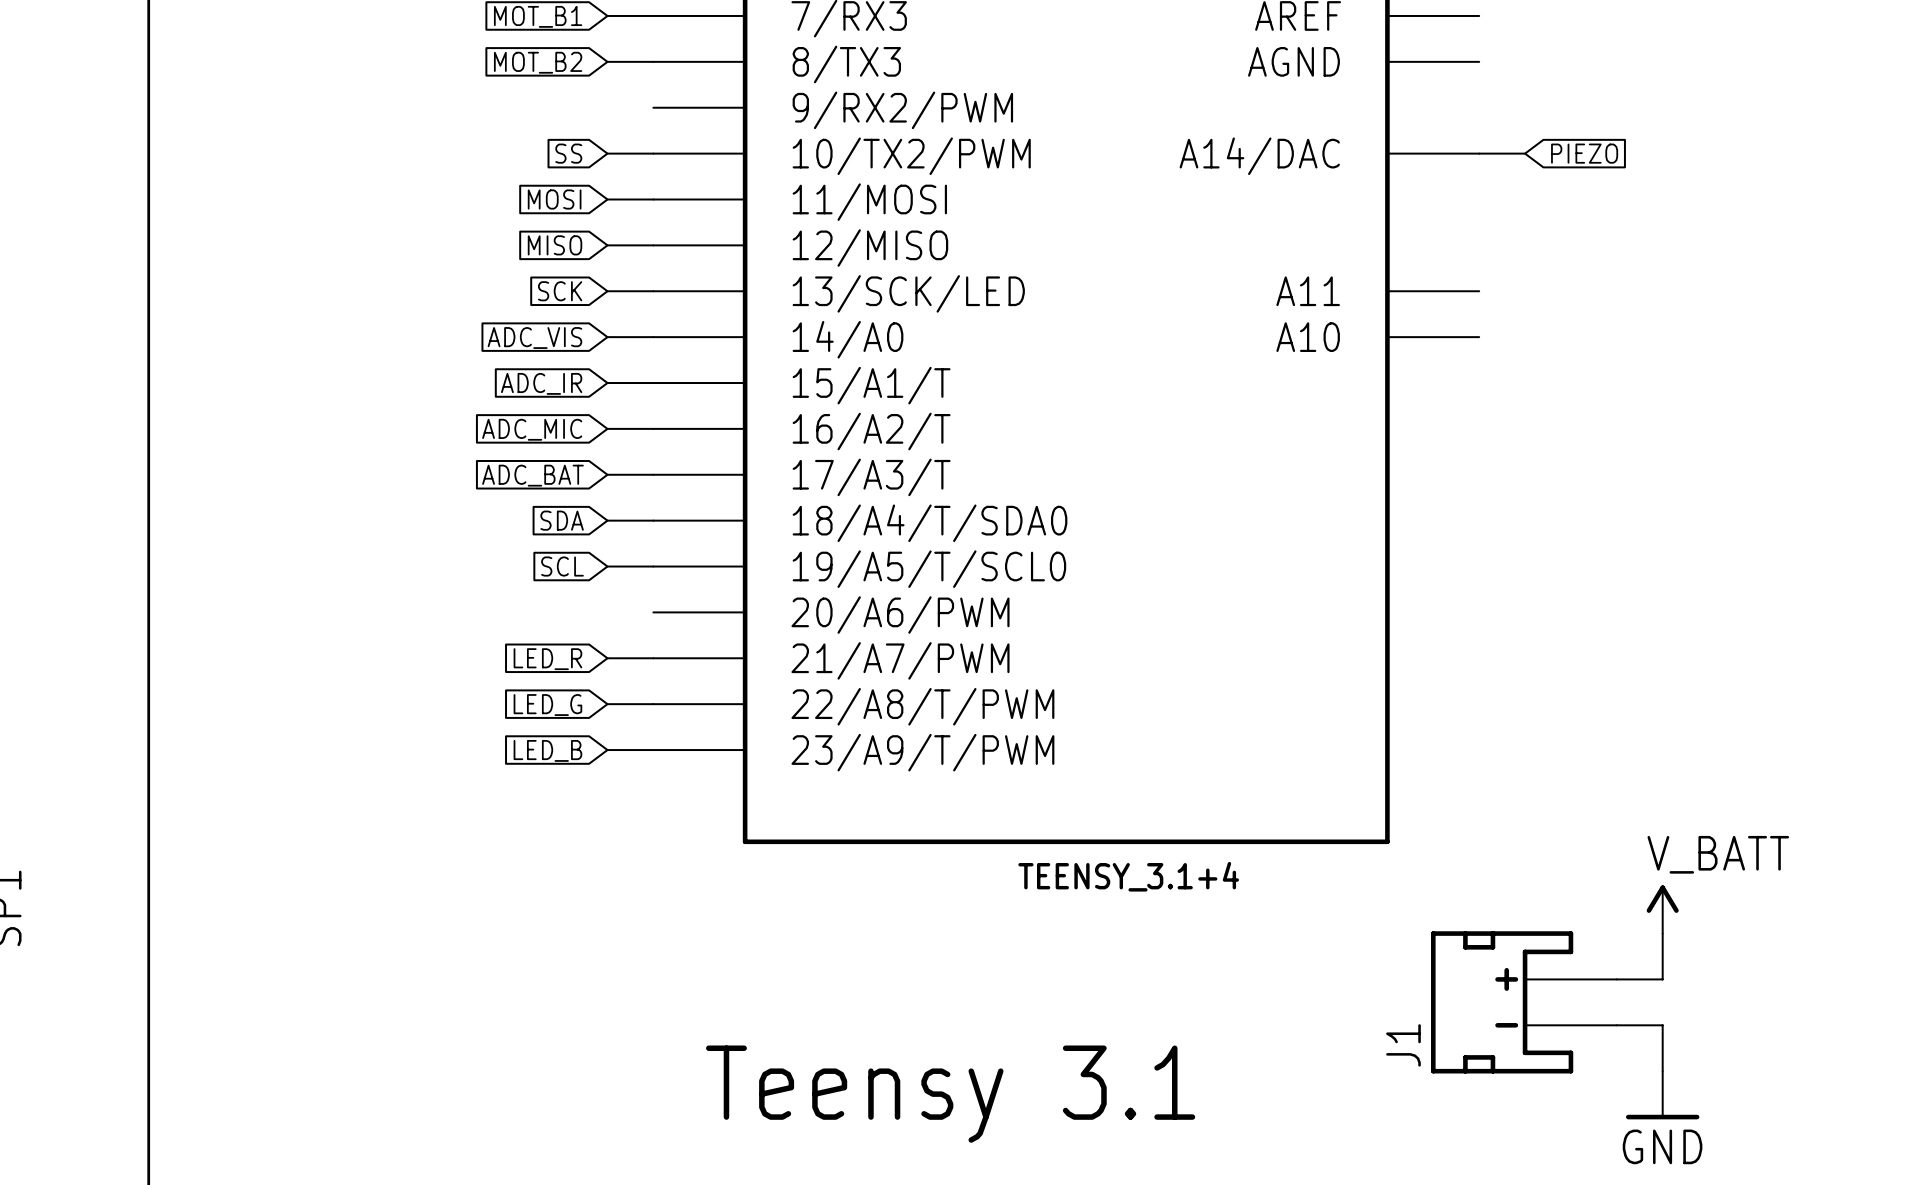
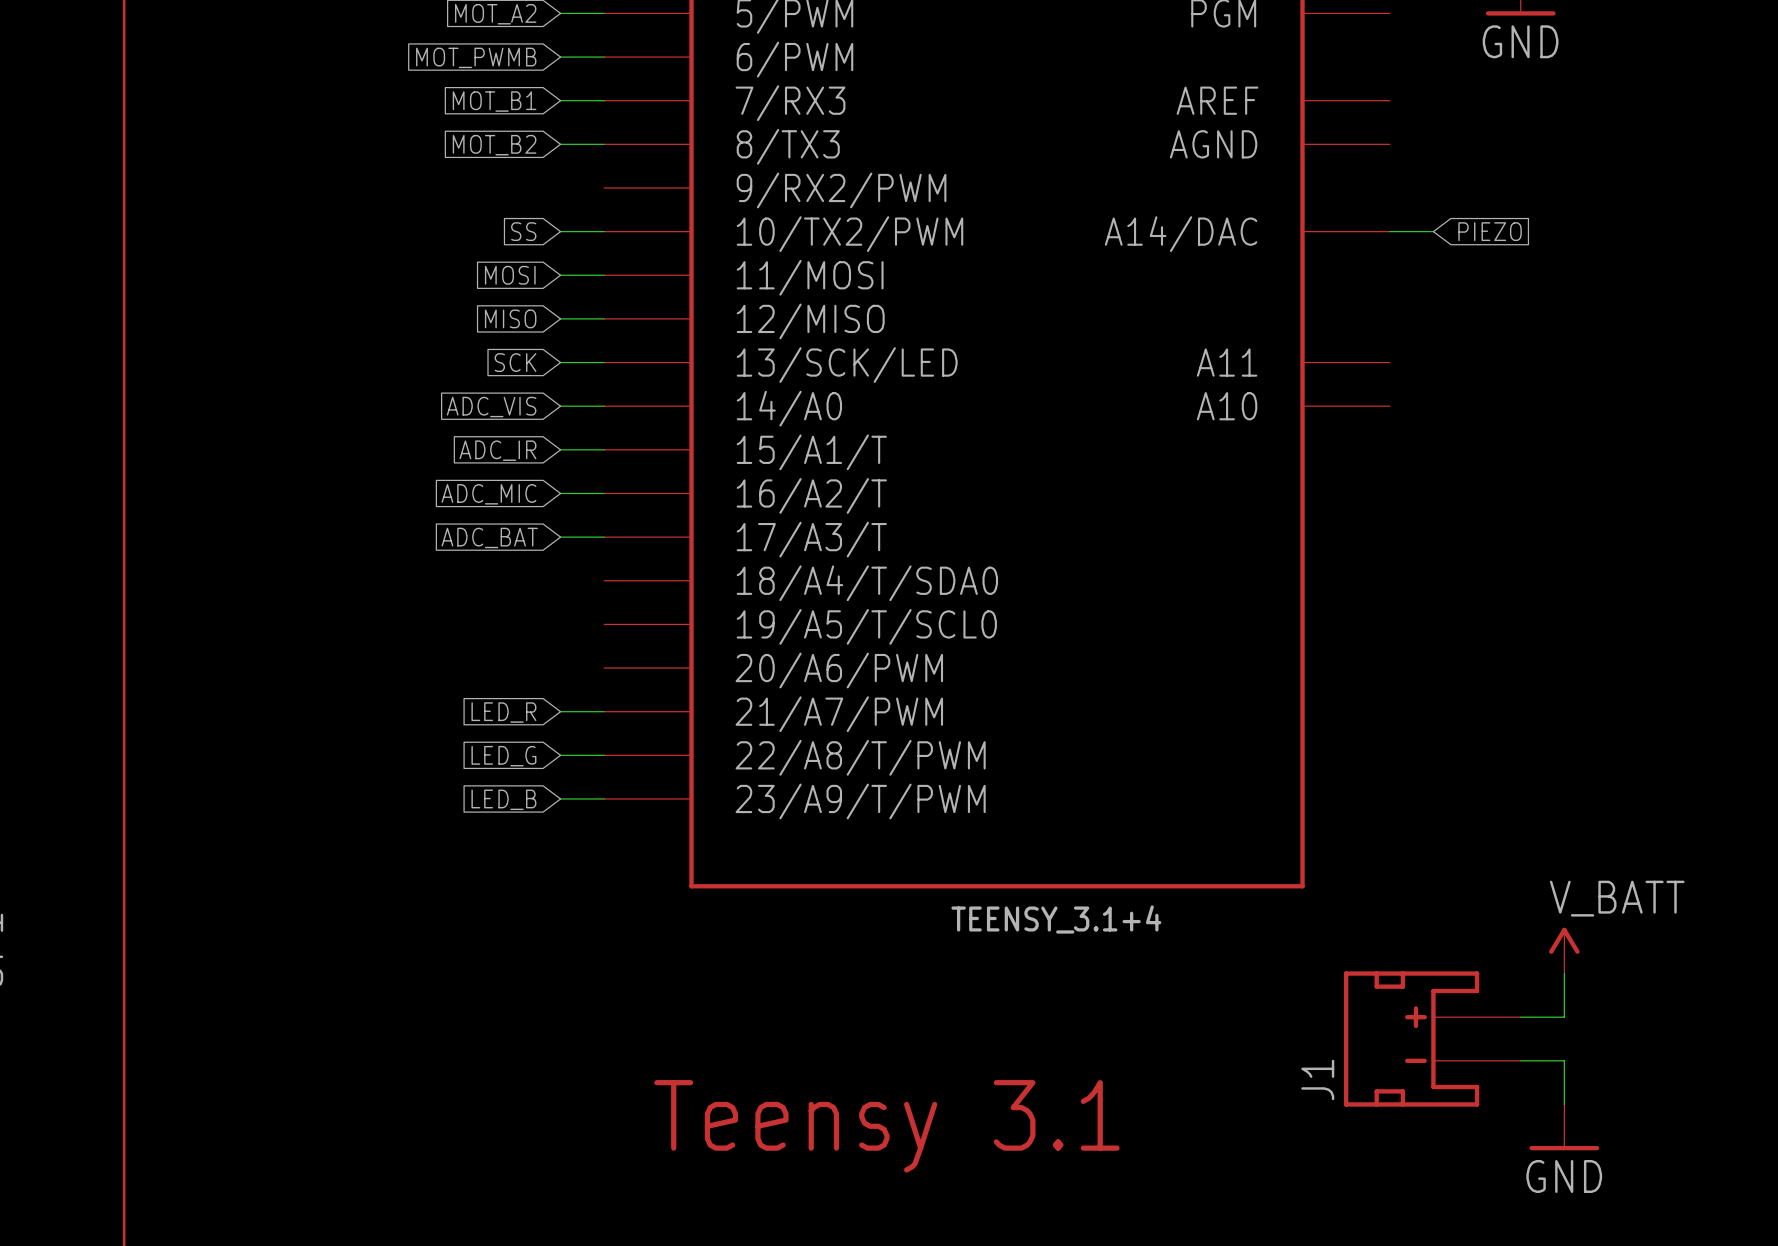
global label: SDA (562, 520) -> none
wire: (607, 520) (653, 520) -> none
global label: SCL (562, 566) -> none
wire: (607, 566) (653, 566) -> none

